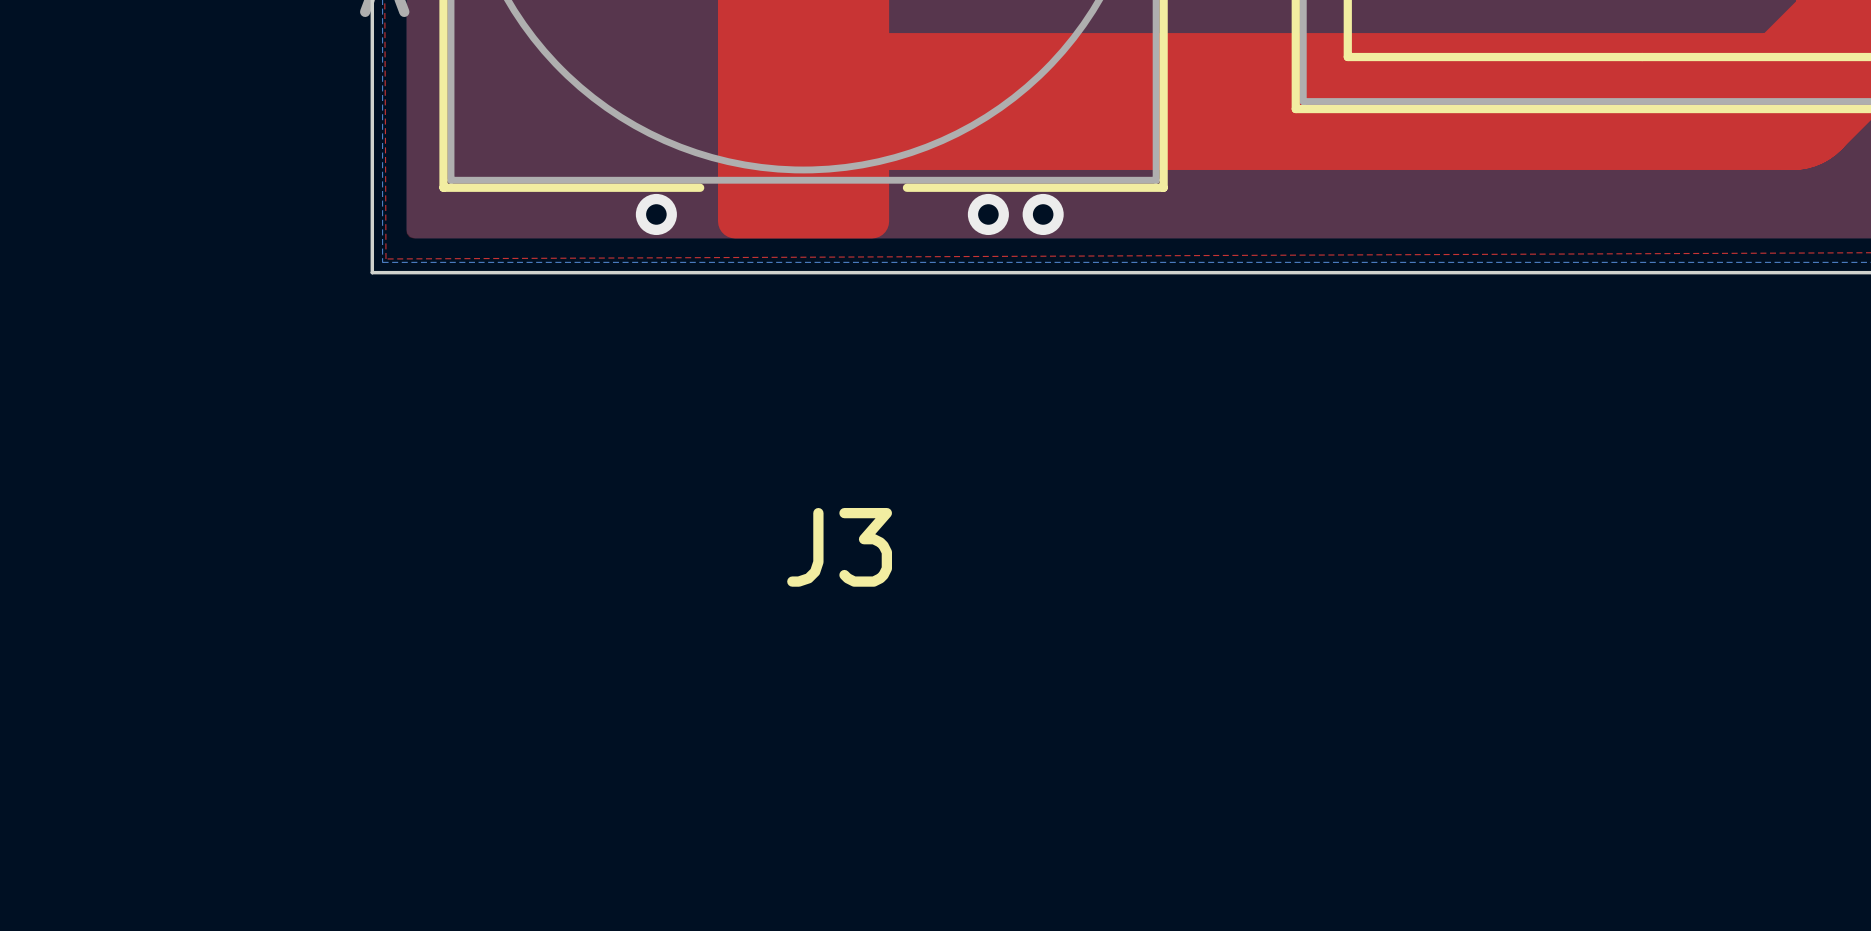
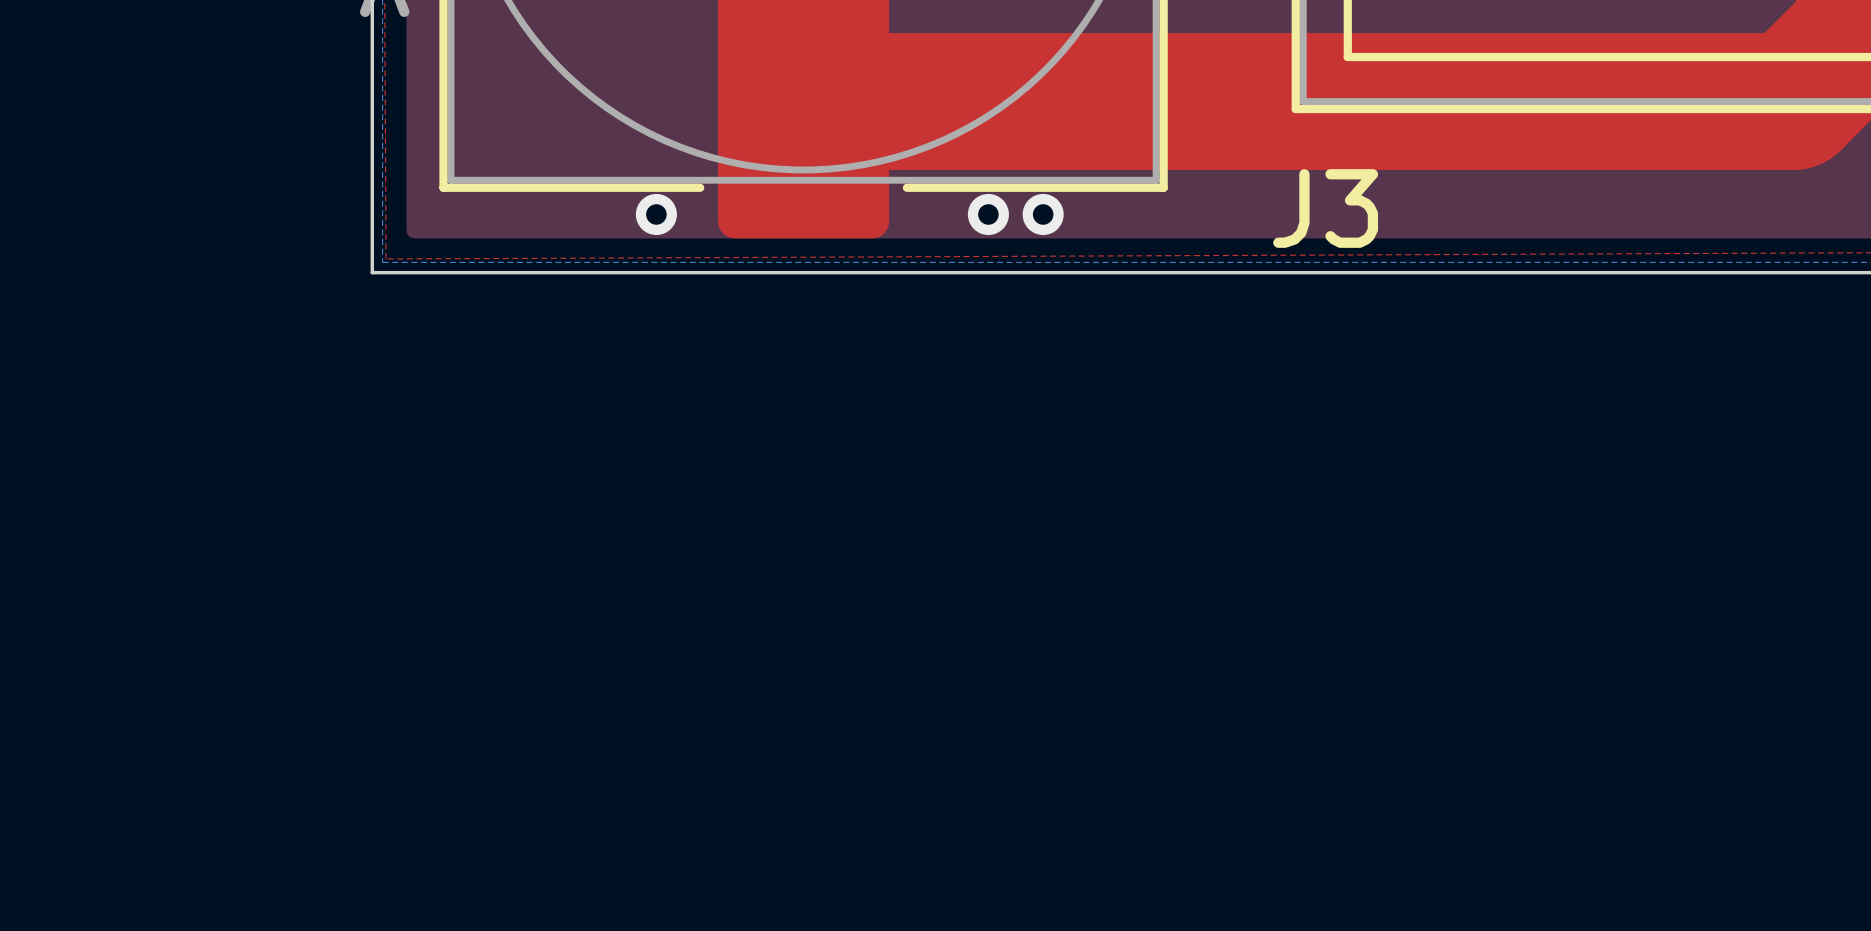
J3 name position: J3 (839, 547) -> J3 (1325, 208)

